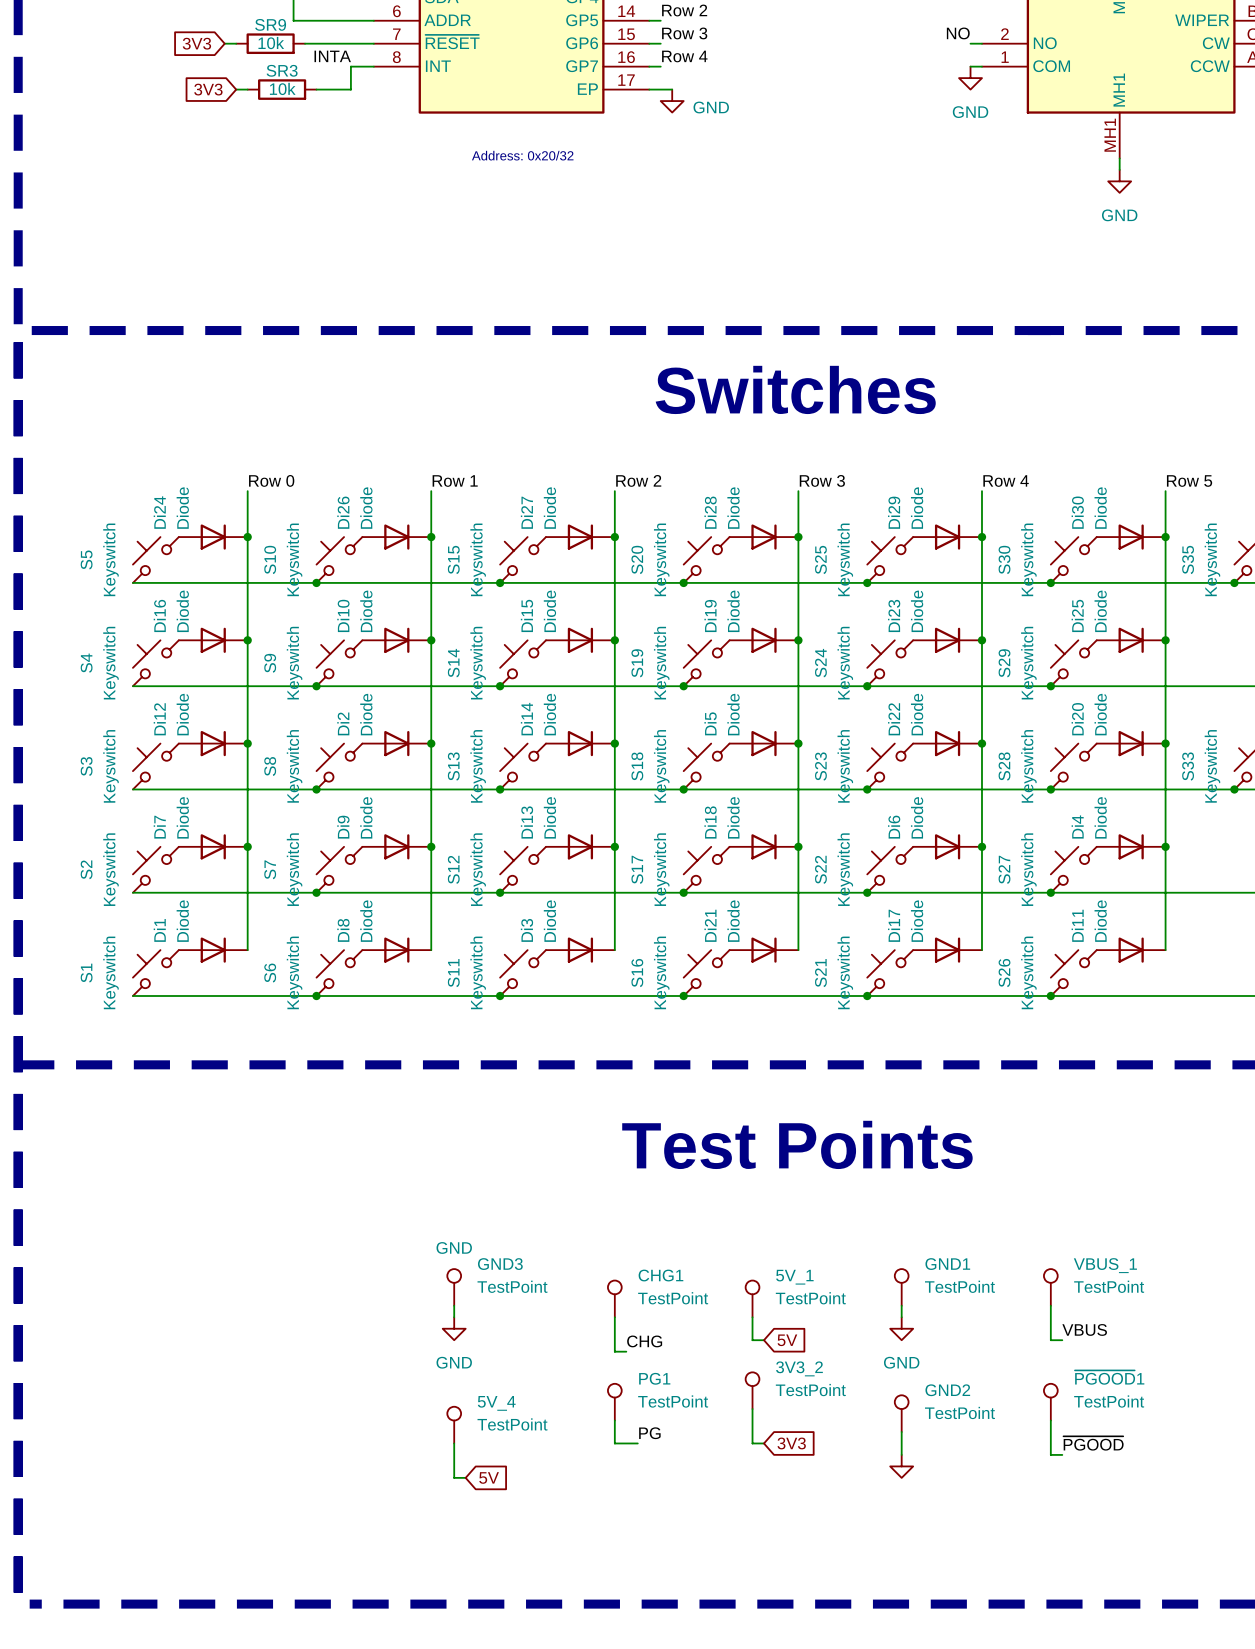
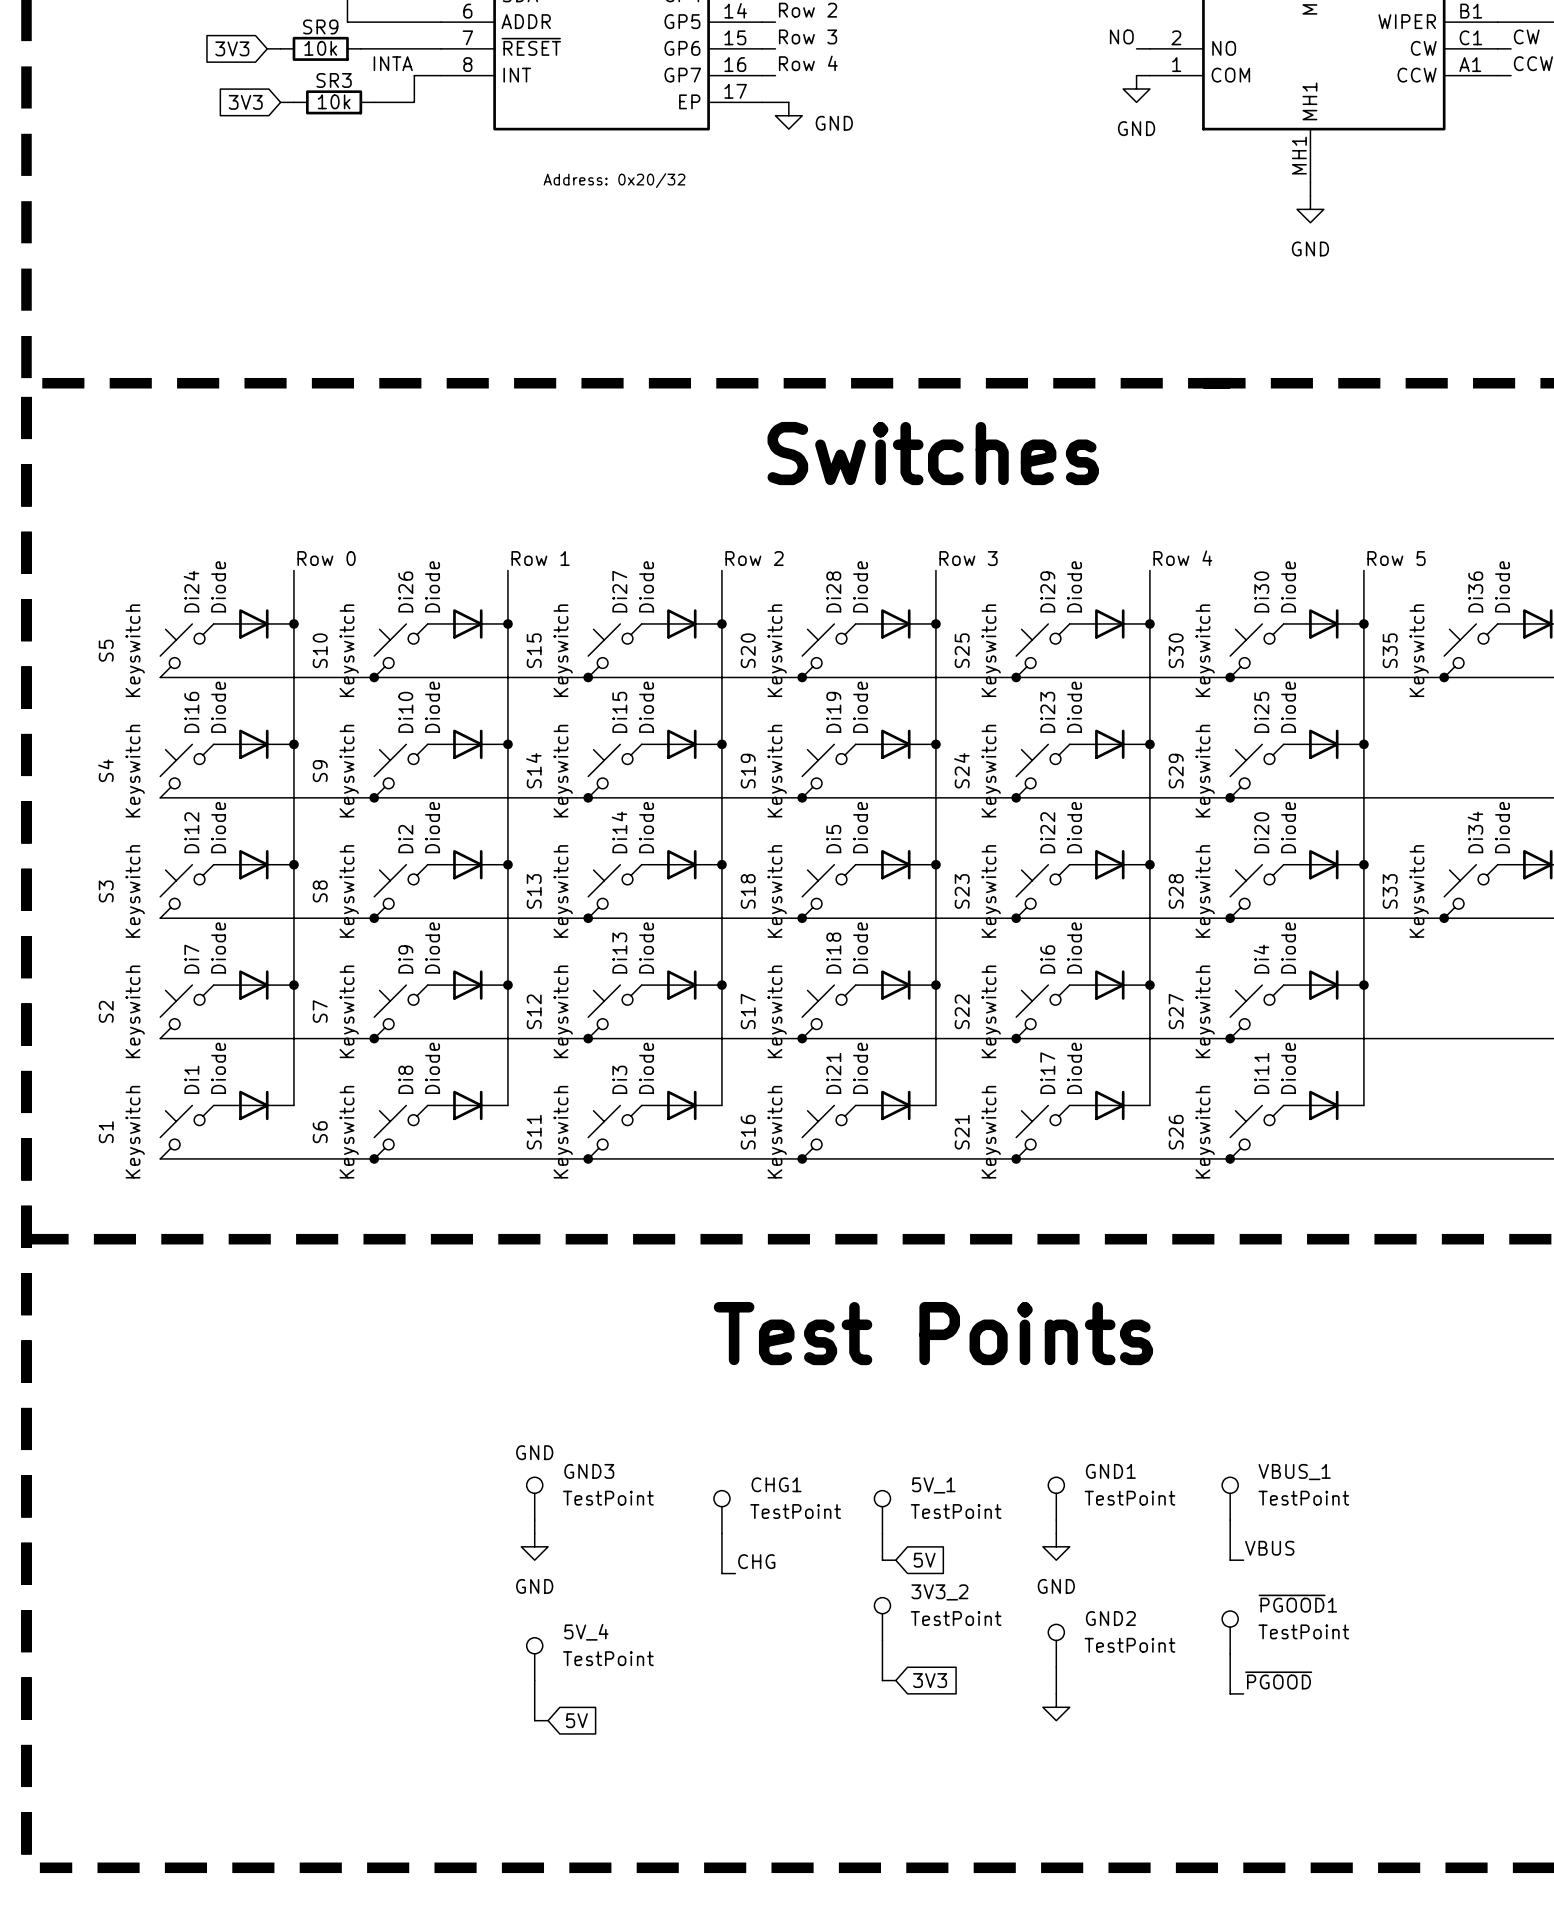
PG1: TestPoint (614, 1402) -> none
wire: (614, 1420) (614, 1443) (637, 1443) -> none
label: PG (649, 1433) -> none

